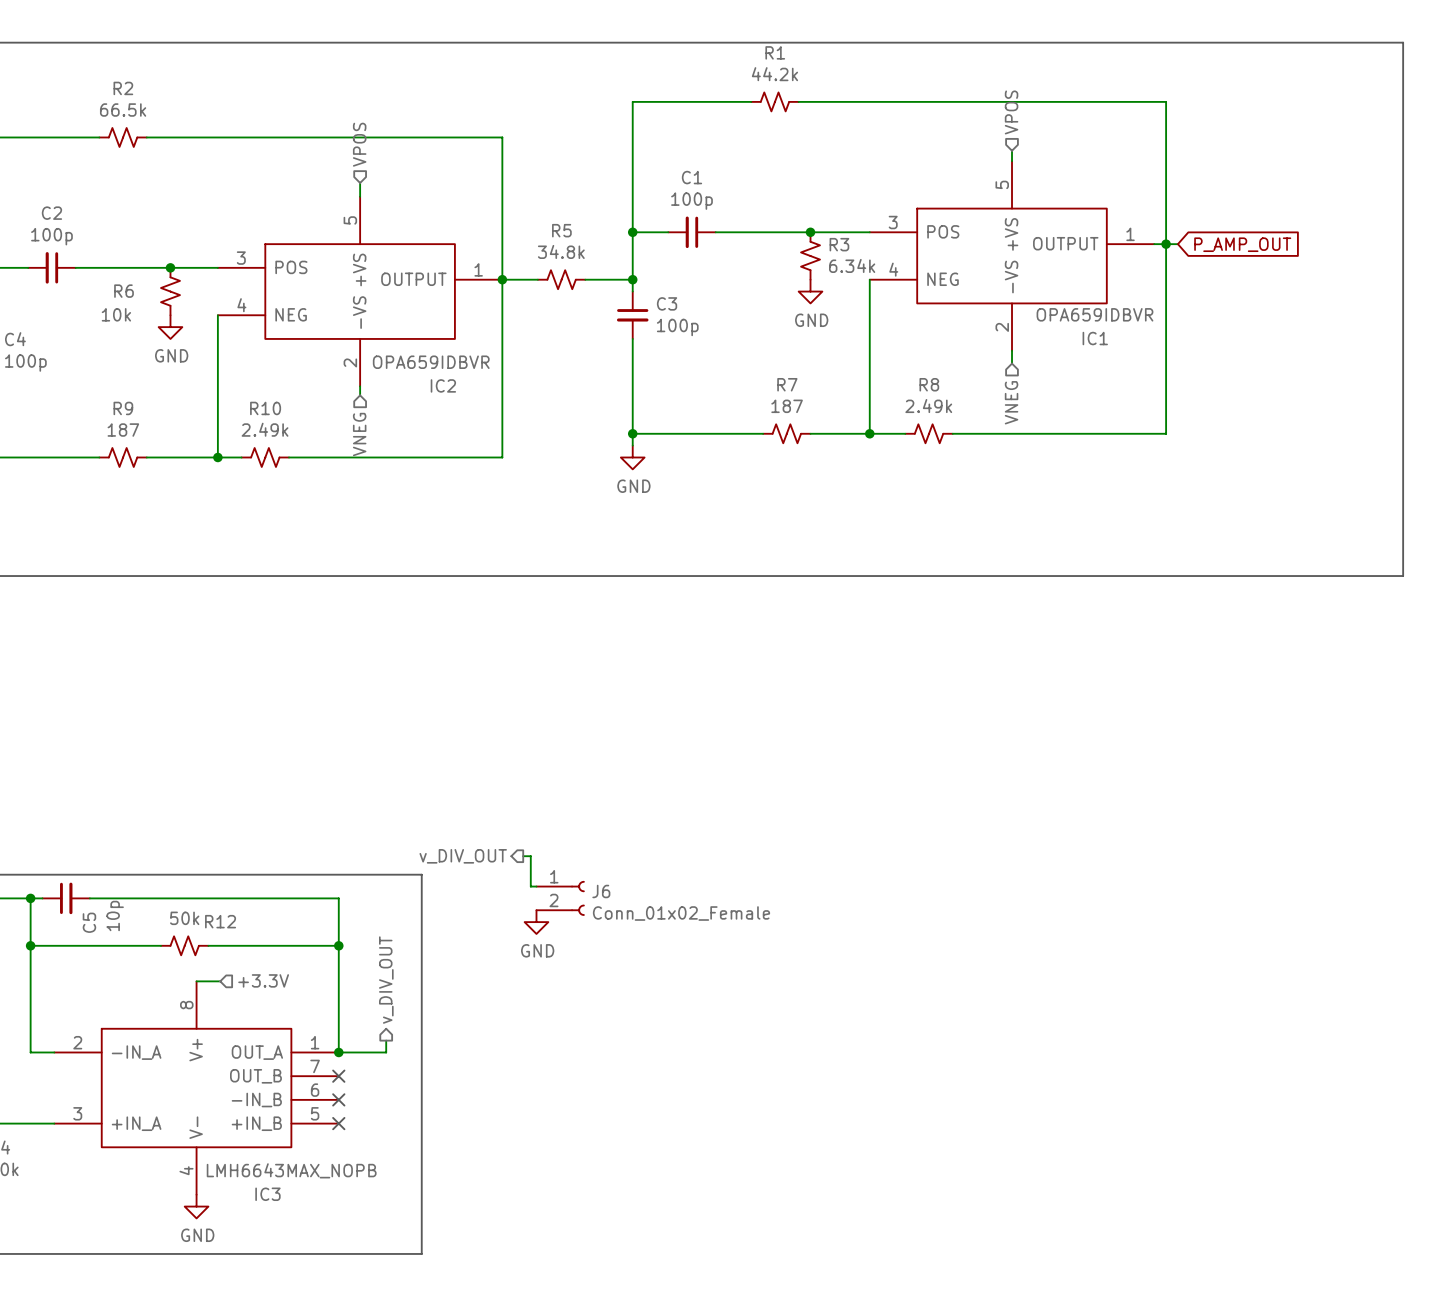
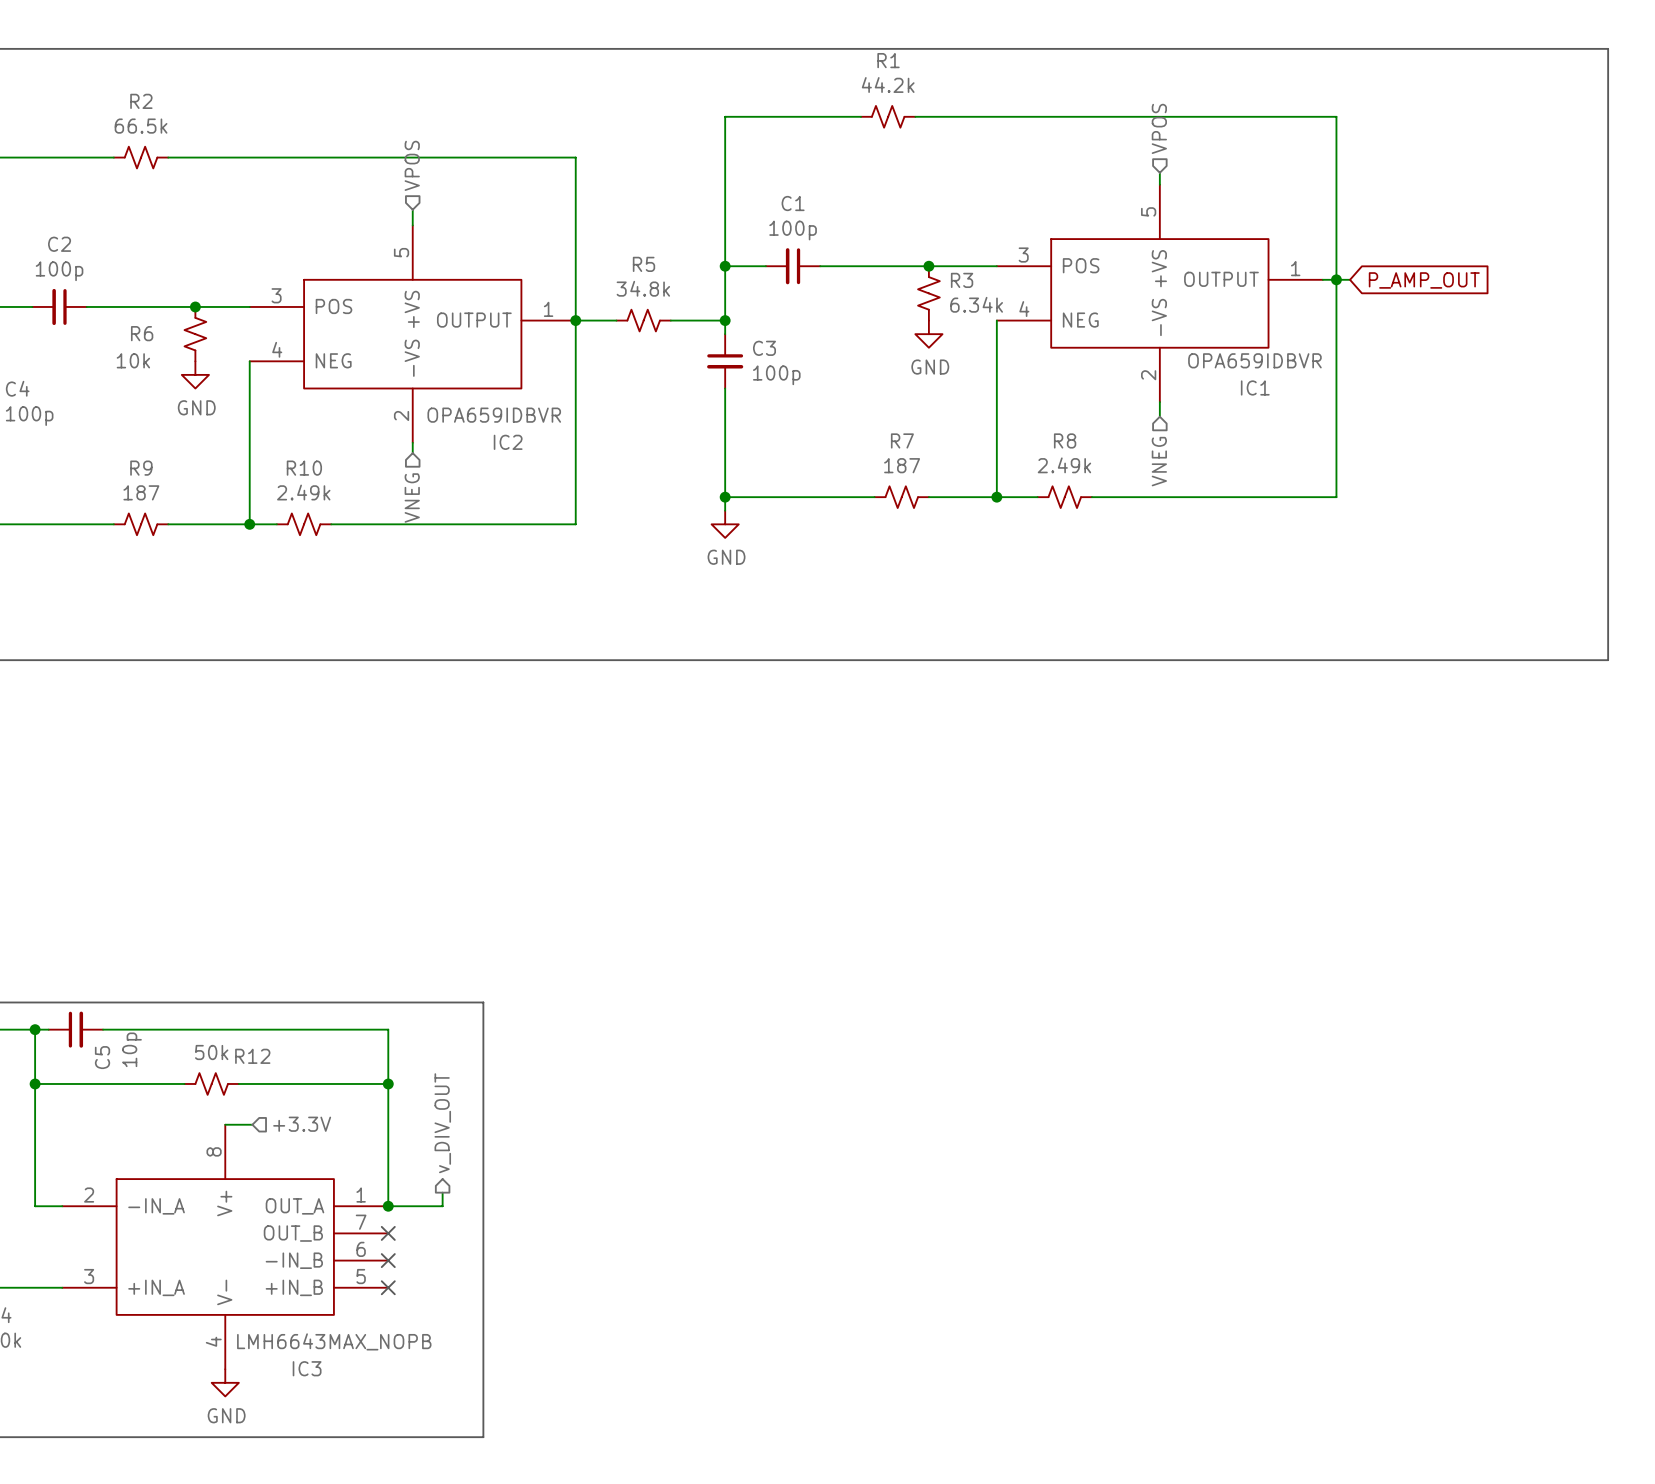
hierarchical label: v_DIV_OUT (463, 856) -> none
wire: (523, 856) (530, 856) (530, 886) (536, 886) -> none
J6: Conn_01x02_Female (560, 898) -> none
power symbol: GND (536, 922) -> none

